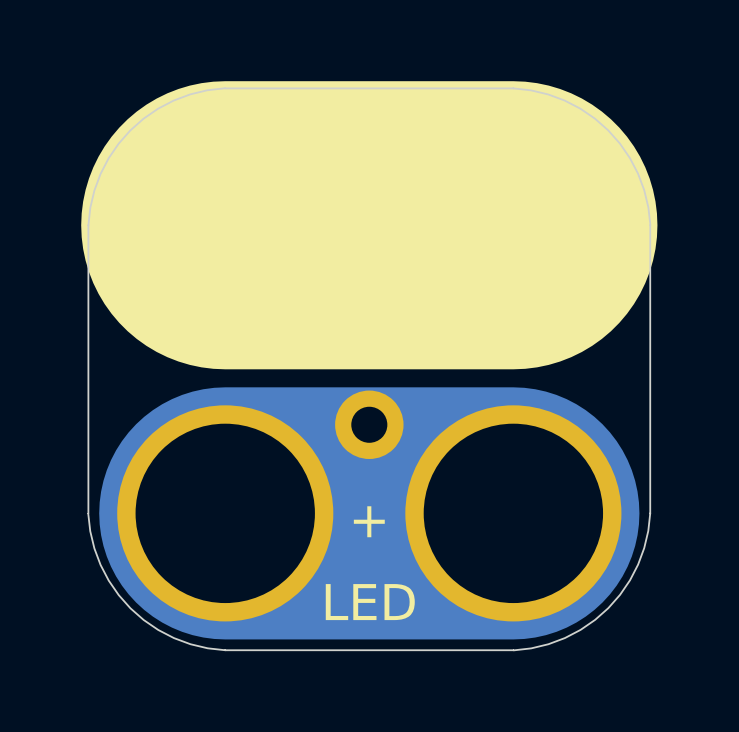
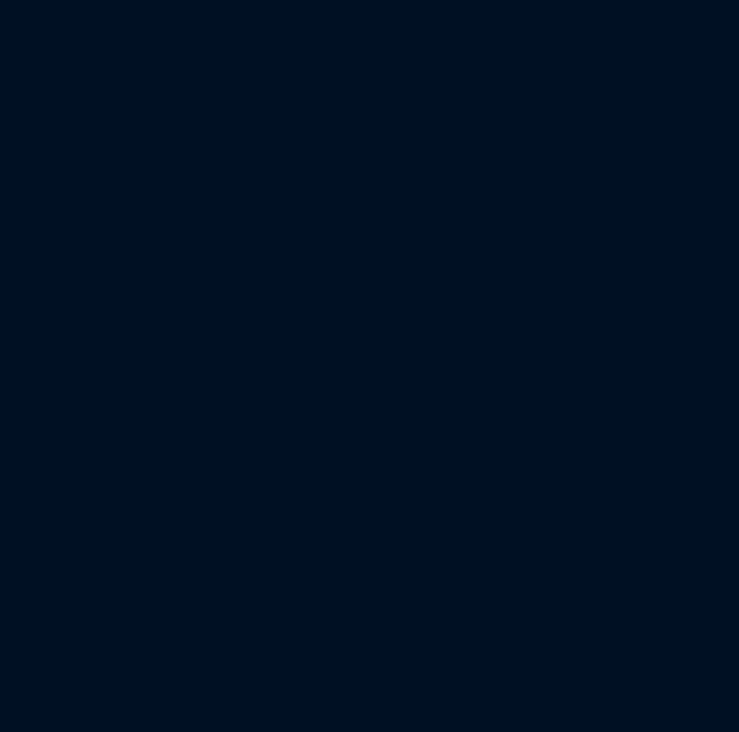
part: LED (369, 366) -> none

